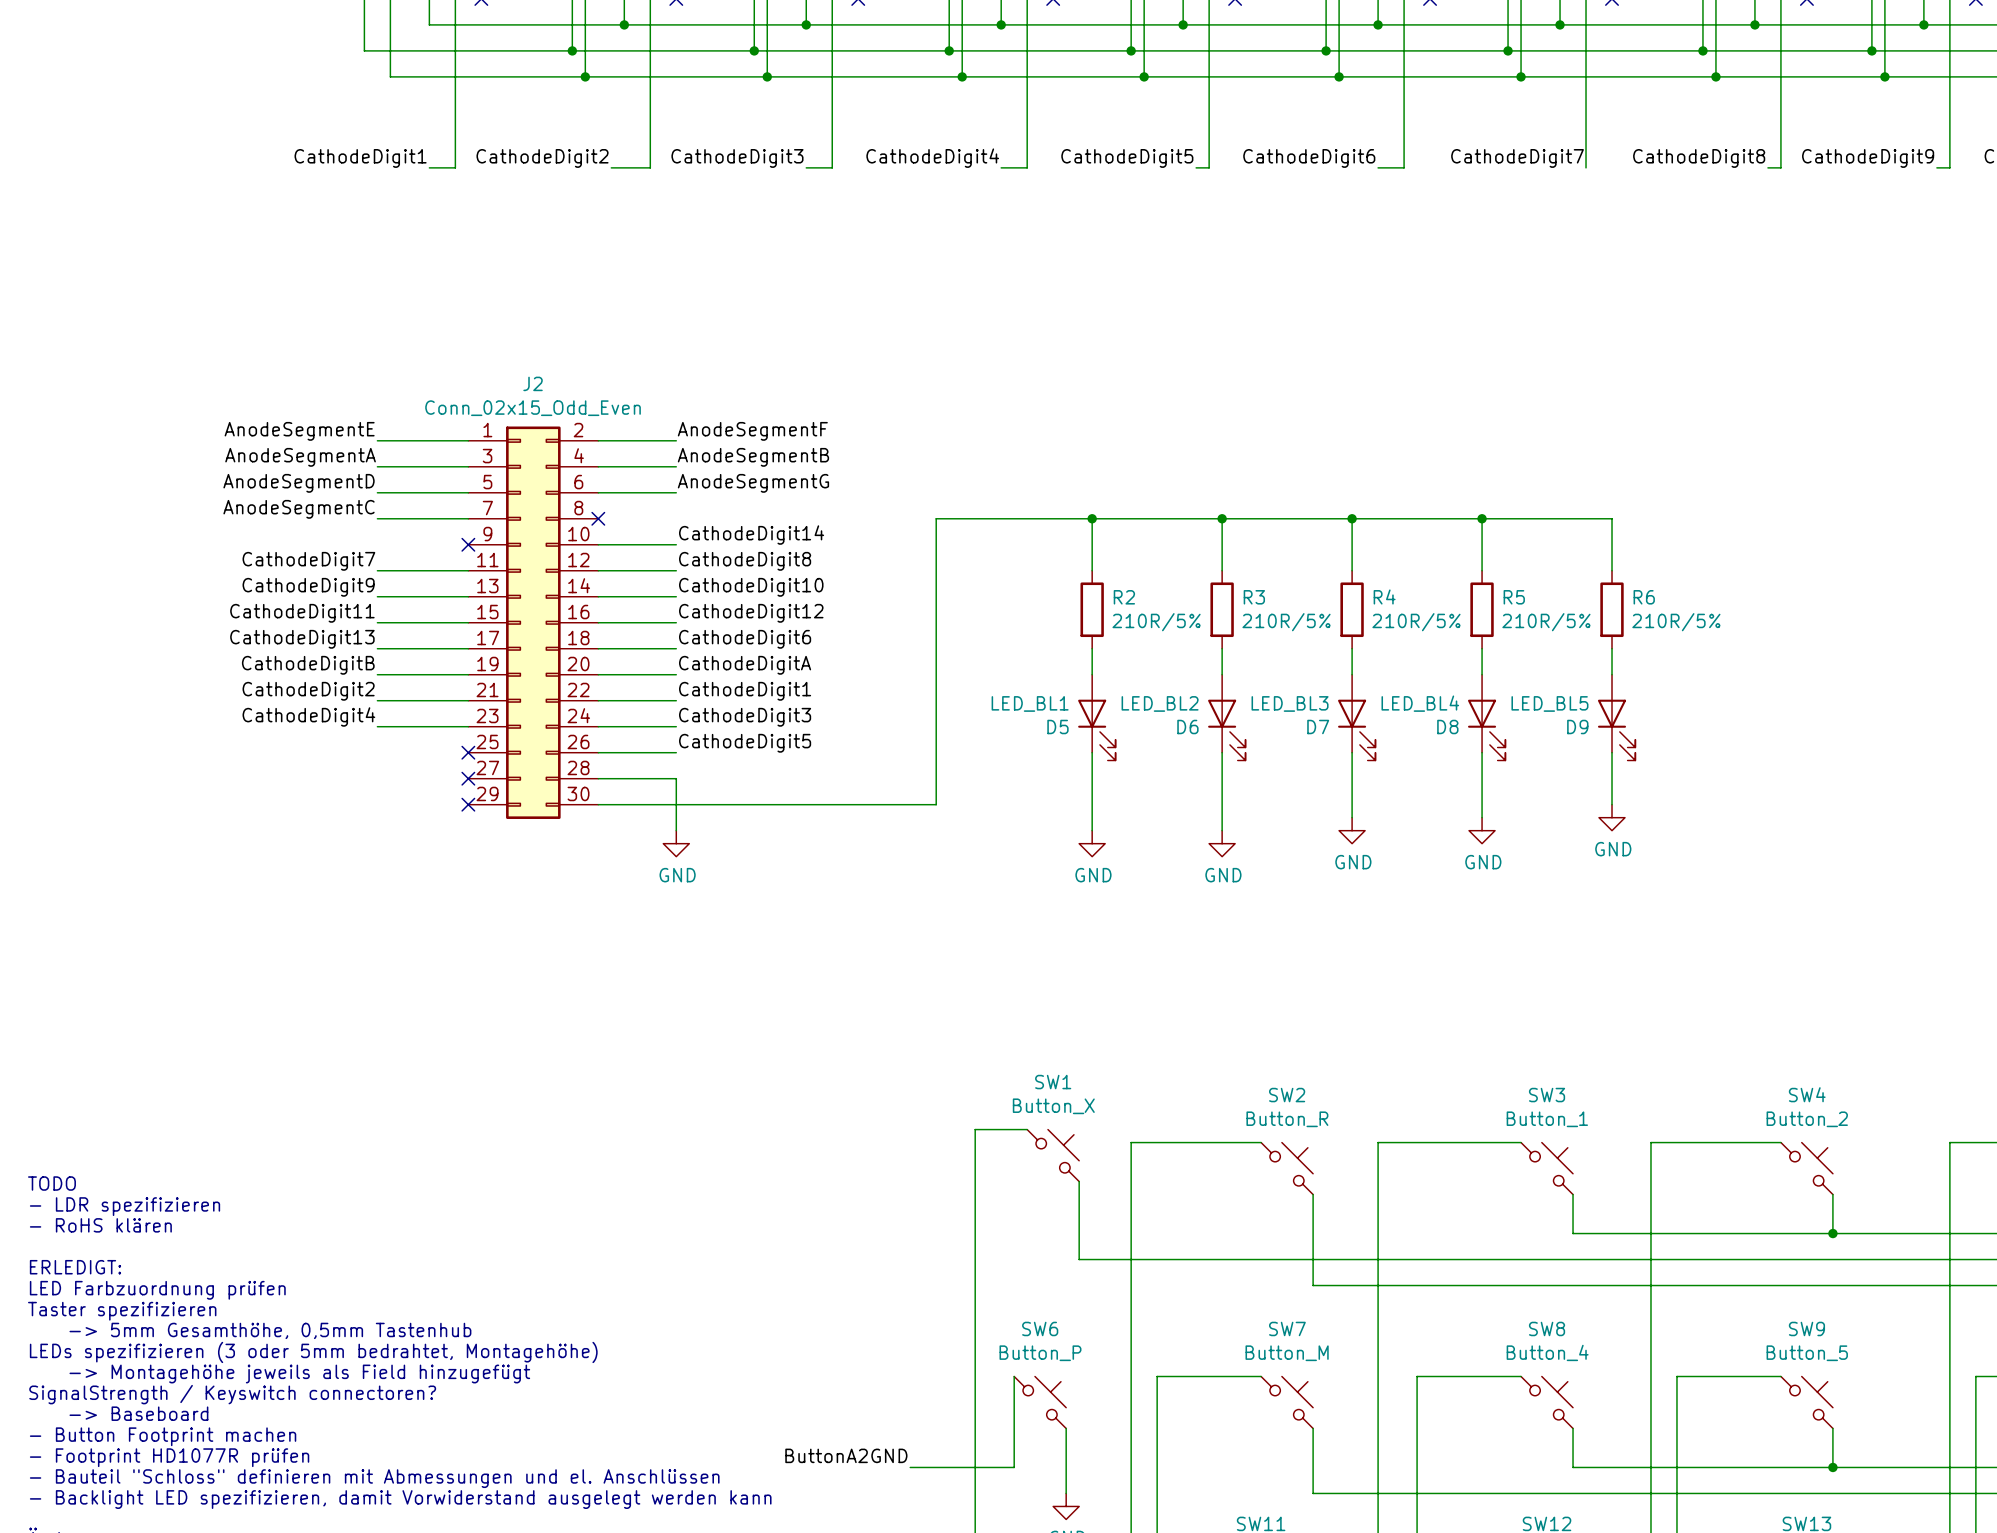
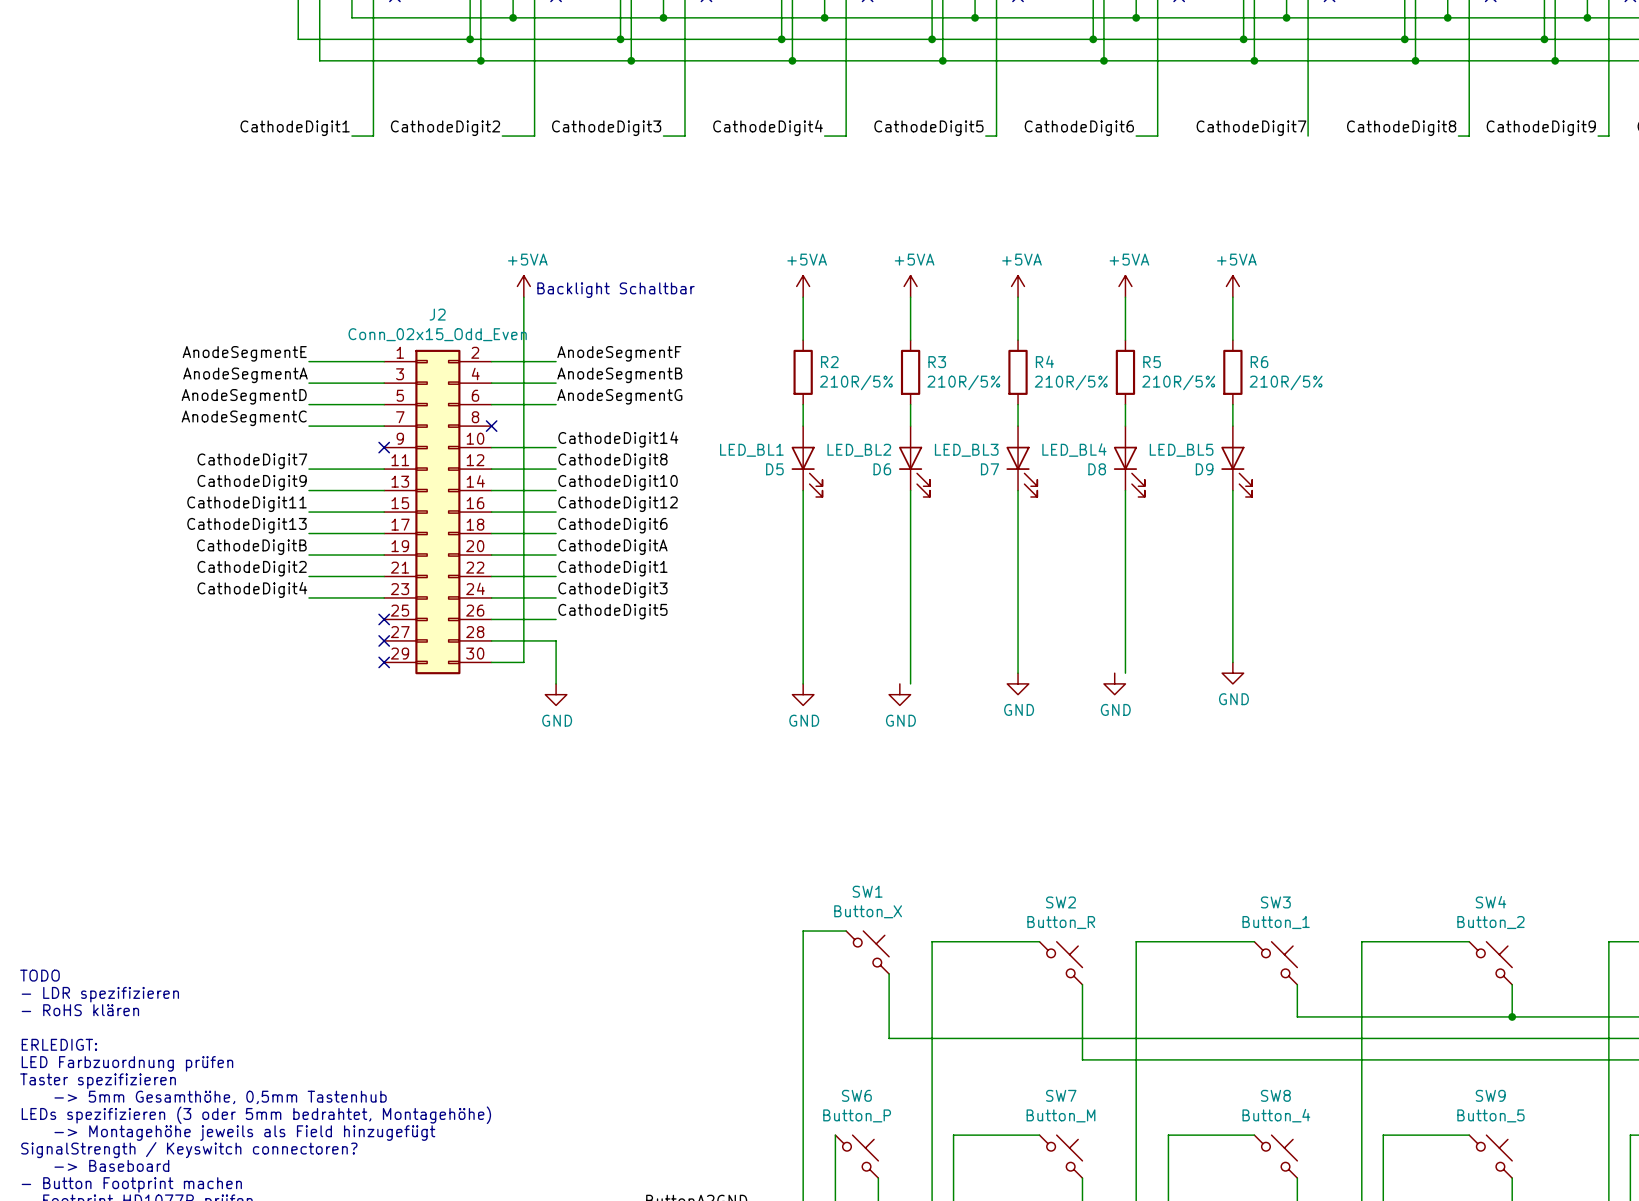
power symbol: none -> +5VA (523, 286)
power symbol: none -> +5VA (803, 286)
power symbol: none -> +5VA (910, 286)
power symbol: none -> +5VA (1018, 286)
power symbol: none -> +5VA (1125, 286)
power symbol: none -> +5VA (1232, 286)
text: none -> Backlight Schaltbar (616, 290)
wire: none -> (1232, 297) (1232, 340)
wire: (1092, 518) (1092, 570) -> (803, 297) (803, 340)
junction: (1092, 518) -> none
wire: (1222, 518) (1222, 570) -> (910, 297) (910, 340)
junction: (1222, 518) -> none
wire: (1352, 518) (1352, 570) -> (1018, 297) (1018, 340)
junction: (1352, 518) -> none
wire: (1482, 518) (1482, 570) -> (1125, 297) (1125, 340)
junction: (1482, 518) -> none
wire: (1612, 570) (1612, 518) (936, 518) (936, 804) (637, 804) -> (523, 297) (523, 662)
wire: none -> (803, 490) (803, 683)
wire: none -> (910, 490) (910, 683)
wire: none -> (1018, 490) (1018, 673)
wire: none -> (1125, 490) (1125, 673)
wire: none -> (1232, 490) (1232, 662)
R2 position: (1092, 609) -> (803, 372)
R3 position: (1222, 609) -> (910, 372)
R4 position: (1352, 609) -> (1018, 372)
R5 position: (1482, 609) -> (1125, 372)
R6 position: (1612, 609) -> (1232, 372)
wire: (1092, 648) (1092, 674) -> (803, 404) (803, 426)
wire: (1222, 648) (1222, 674) -> (910, 404) (910, 426)
wire: (1352, 648) (1352, 674) -> (1018, 404) (1018, 426)
wire: (1482, 648) (1482, 674) -> (1125, 404) (1125, 426)
wire: (1612, 648) (1612, 674) -> (1232, 404) (1232, 426)
D5 position: (1096, 717) -> (807, 461)
D6 position: (1226, 717) -> (914, 461)
D7 position: (1356, 717) -> (1021, 461)
D8 position: (1486, 717) -> (1129, 461)
D9 position: (1616, 717) -> (1236, 461)
wire: (1092, 752) (1092, 830) -> none
wire: (1222, 752) (1222, 830) -> none
wire: (1352, 752) (1352, 817) -> none
wire: (1482, 752) (1482, 817) -> none
wire: (1612, 752) (1612, 804) -> none
power symbol: GND (1612, 817) -> none
power symbol position: GND (1482, 830) -> GND (1232, 673)
power symbol: none -> GND (803, 694)
power symbol position: GND (1222, 843) -> GND (1018, 683)

